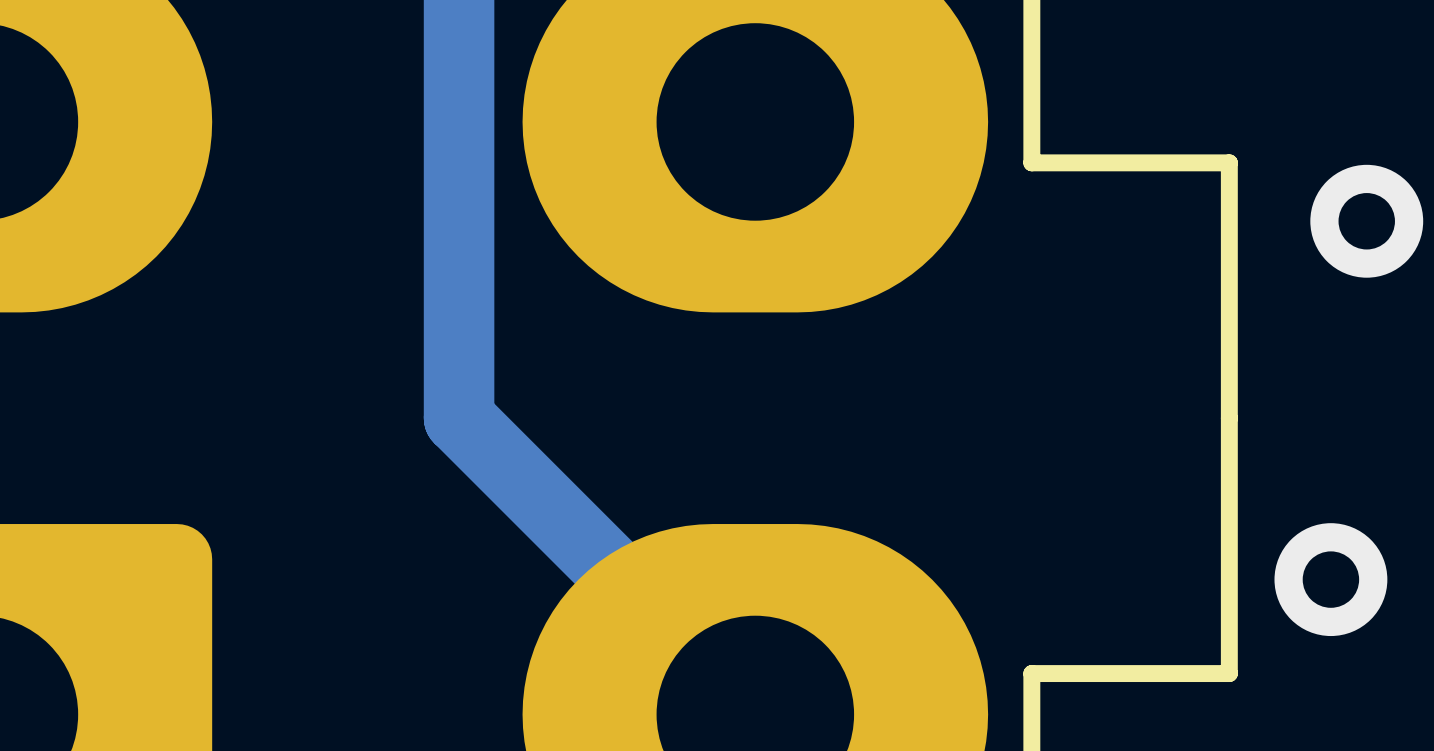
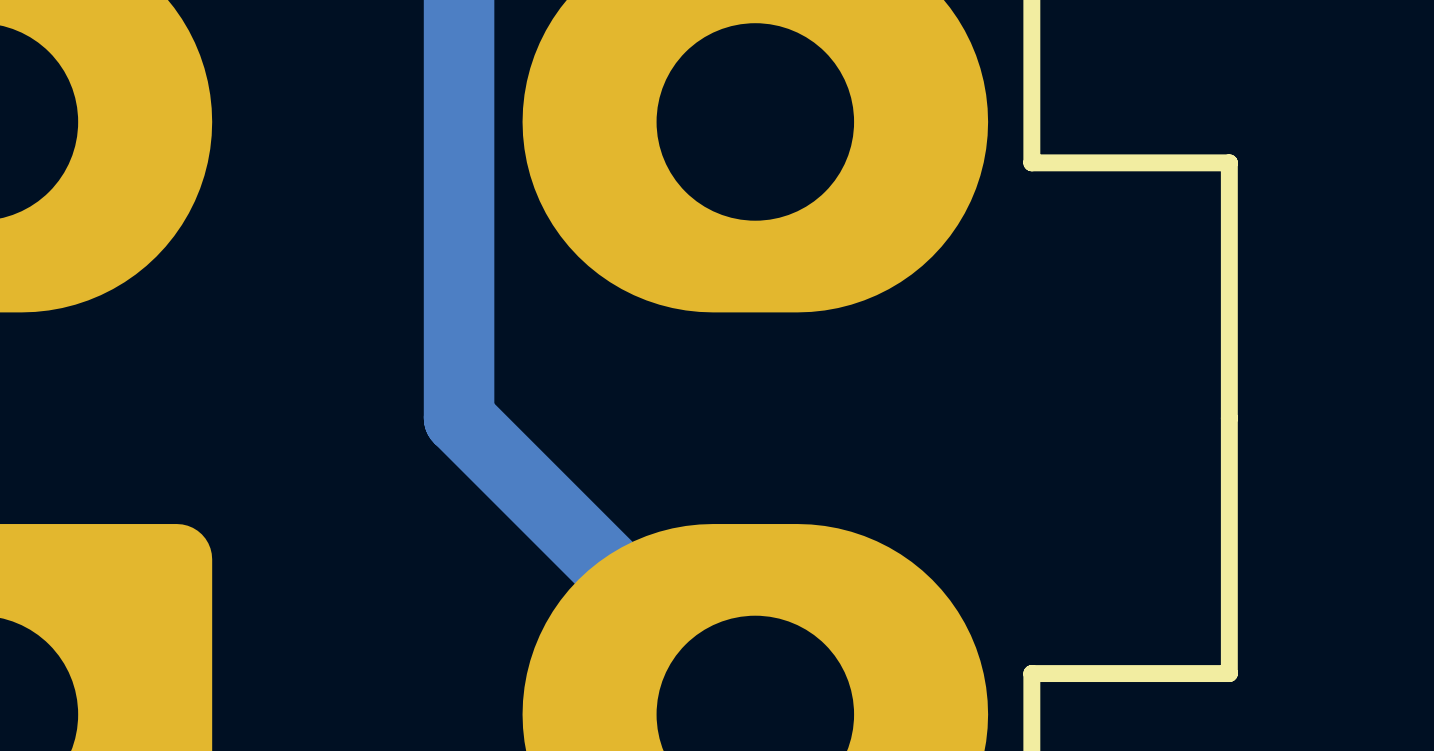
via: (1366, 221) -> none
via: (1330, 579) -> none

